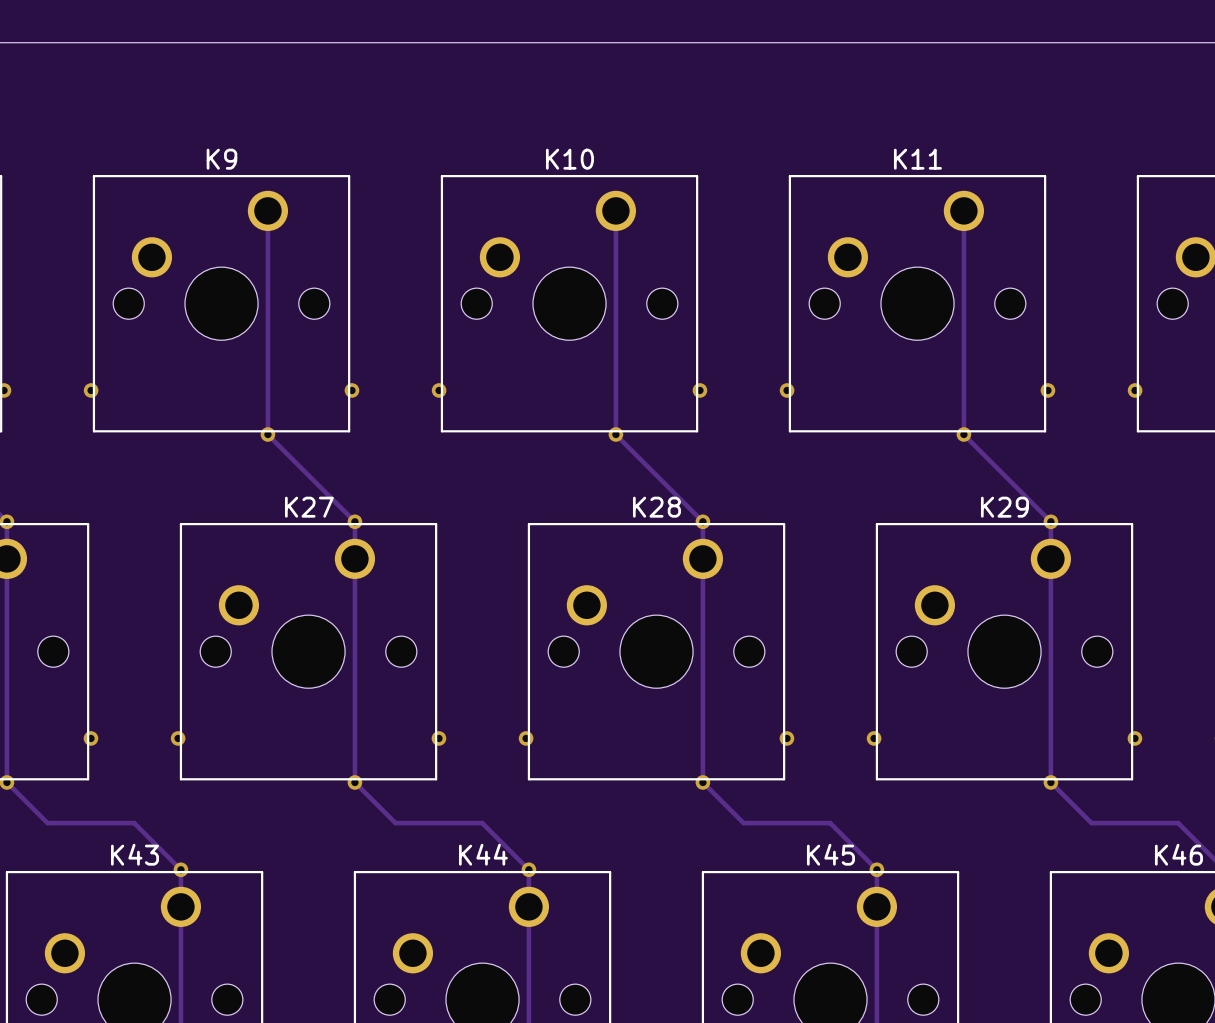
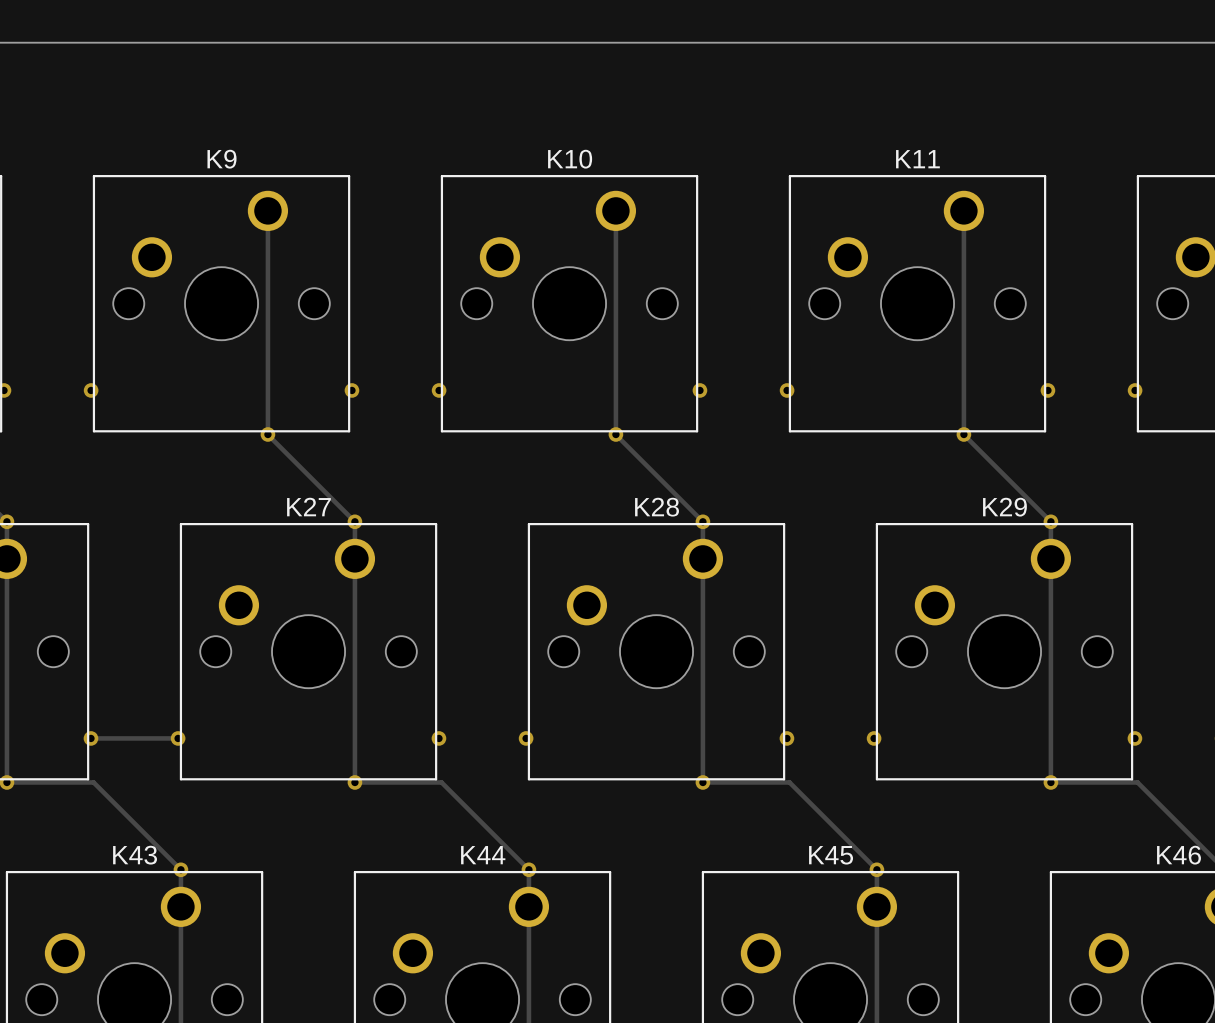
track: none -> (90, 738) (178, 738)
track: (6, 782) (47, 823) (134, 823) -> (6, 782) (93, 782) (134, 823)
track: (354, 782) (395, 823) (482, 823) -> (354, 782) (441, 782) (482, 823)
track: (702, 782) (743, 823) (830, 823) -> (702, 782) (789, 782) (830, 823)
track: (1050, 782) (1091, 823) (1178, 823) -> (1050, 782) (1137, 782) (1178, 823)

